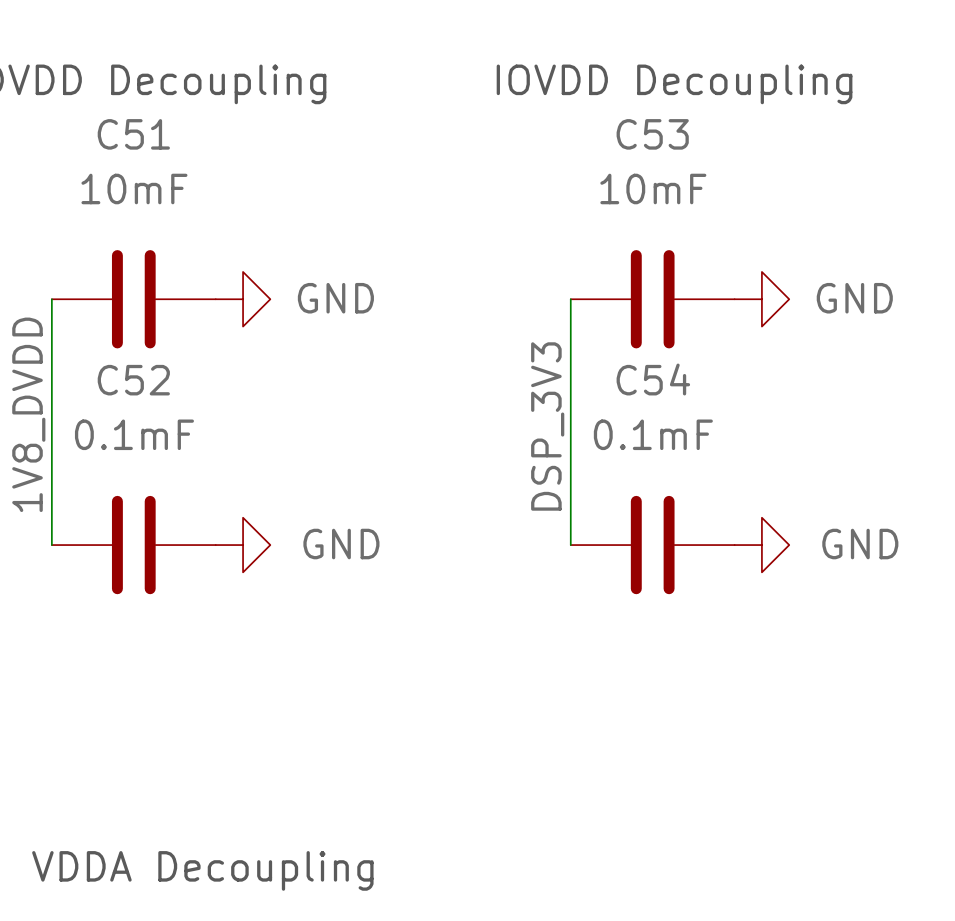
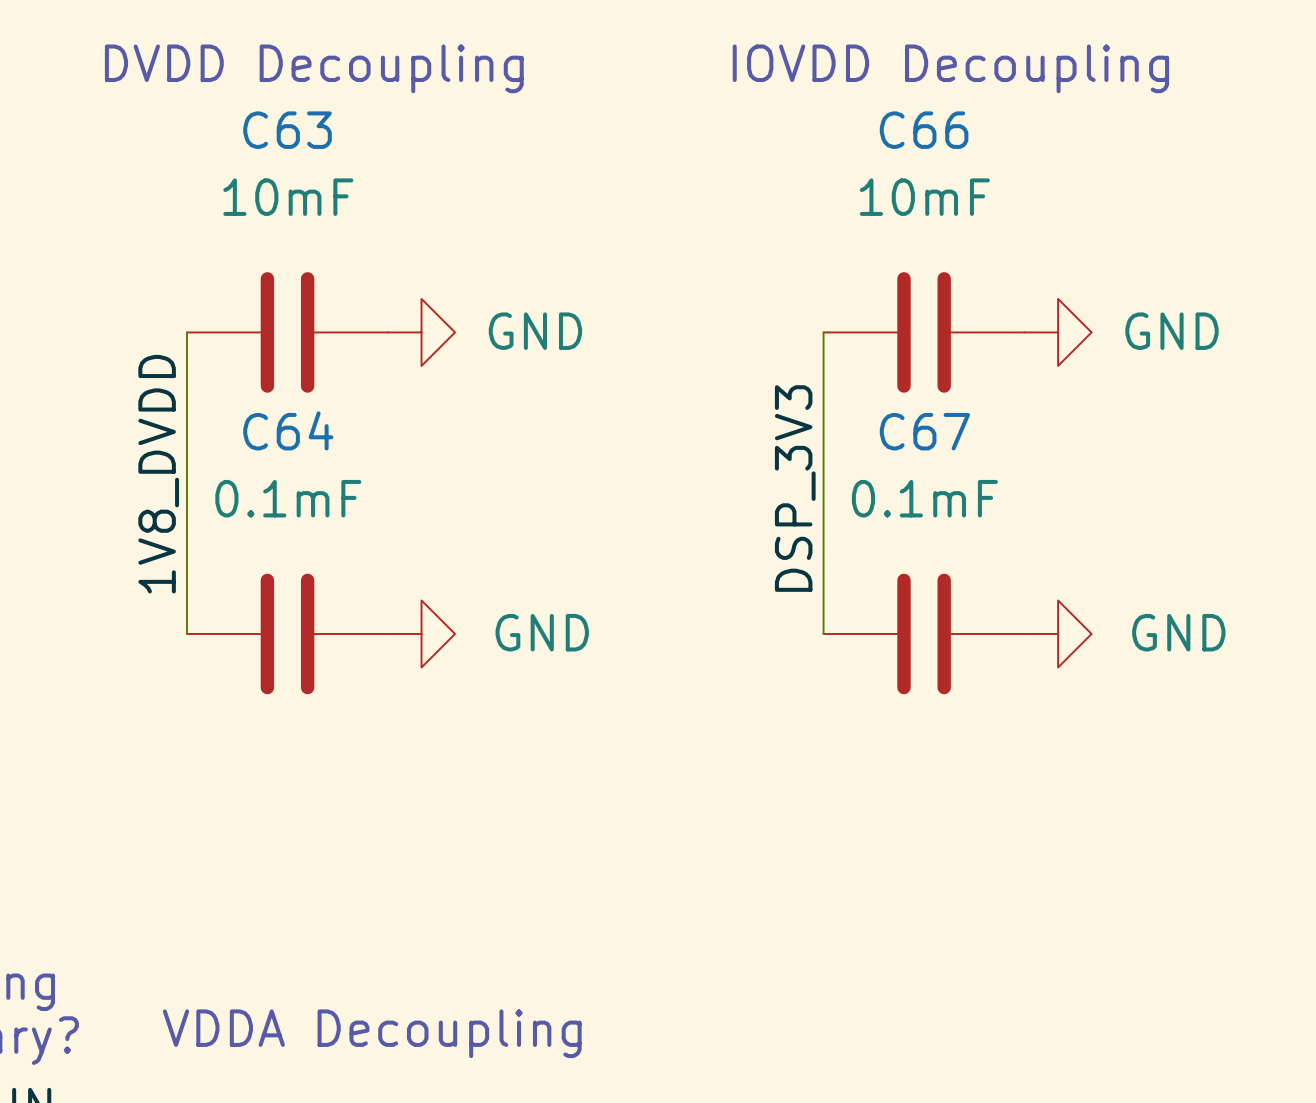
C51 name: C51 (133, 134) -> C63 (287, 130)
C53 name: C53 (652, 134) -> C66 (924, 130)
C54 name: C54 (653, 379) -> C67 (924, 431)
C52 name: C52 (133, 380) -> C64 (288, 430)

